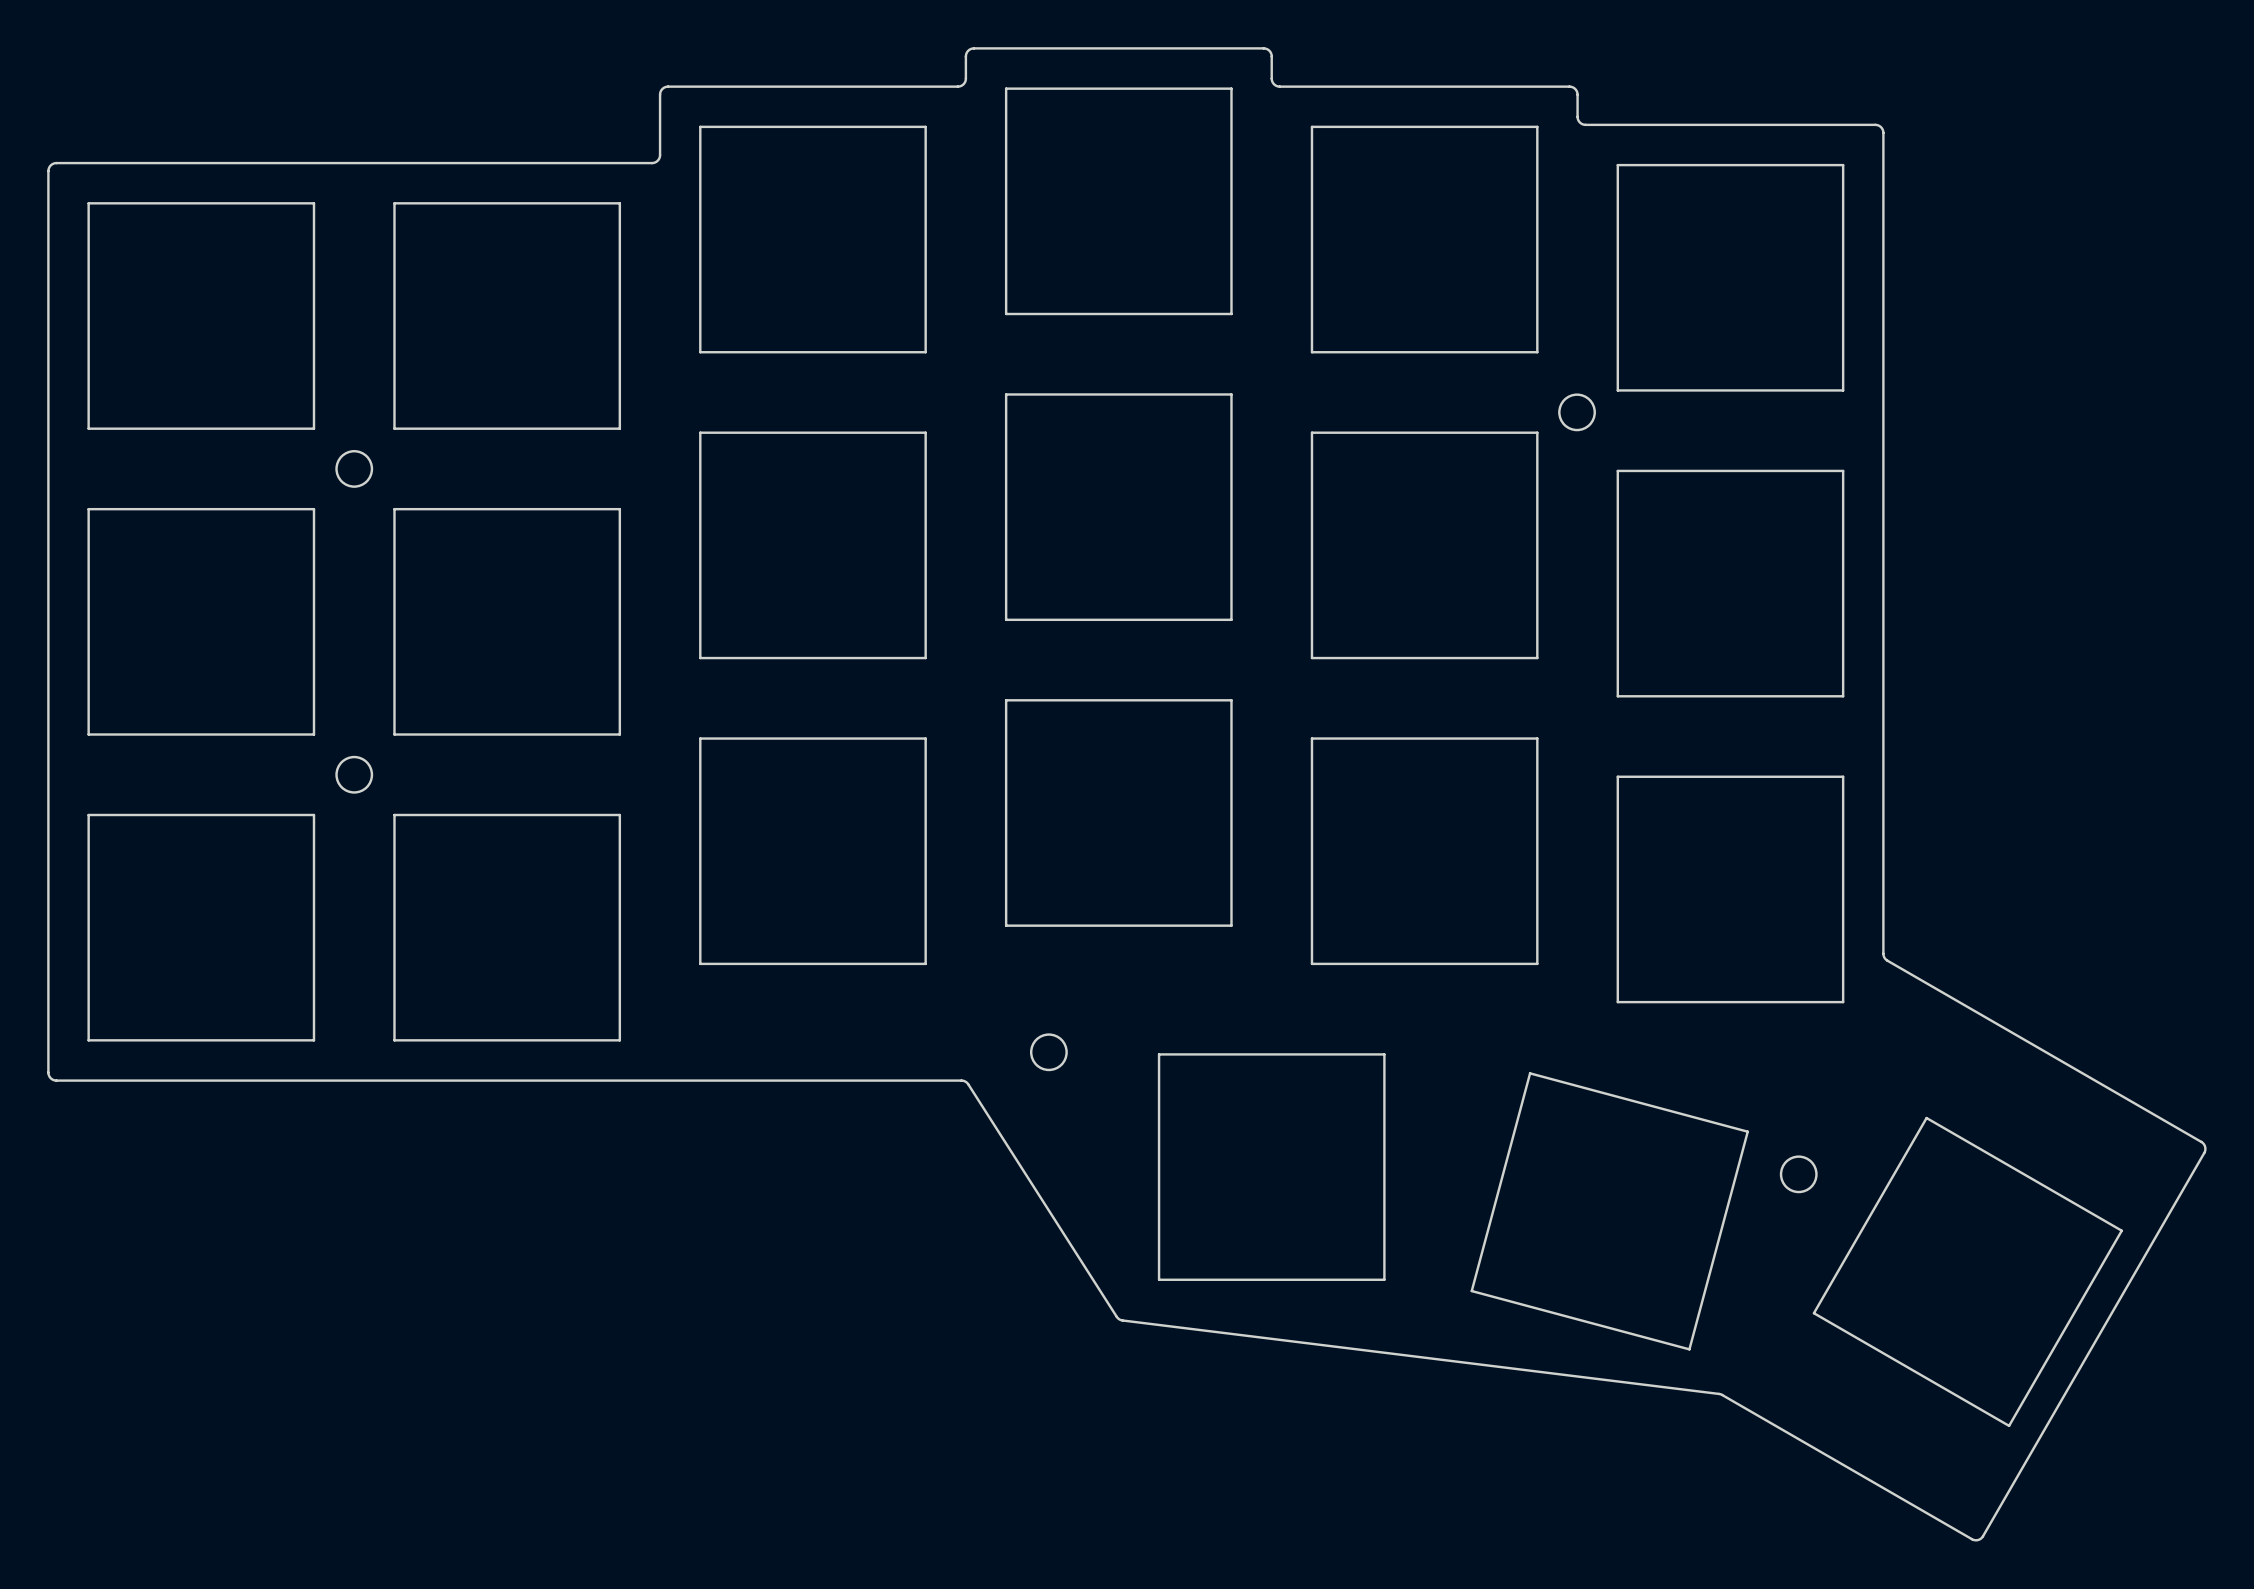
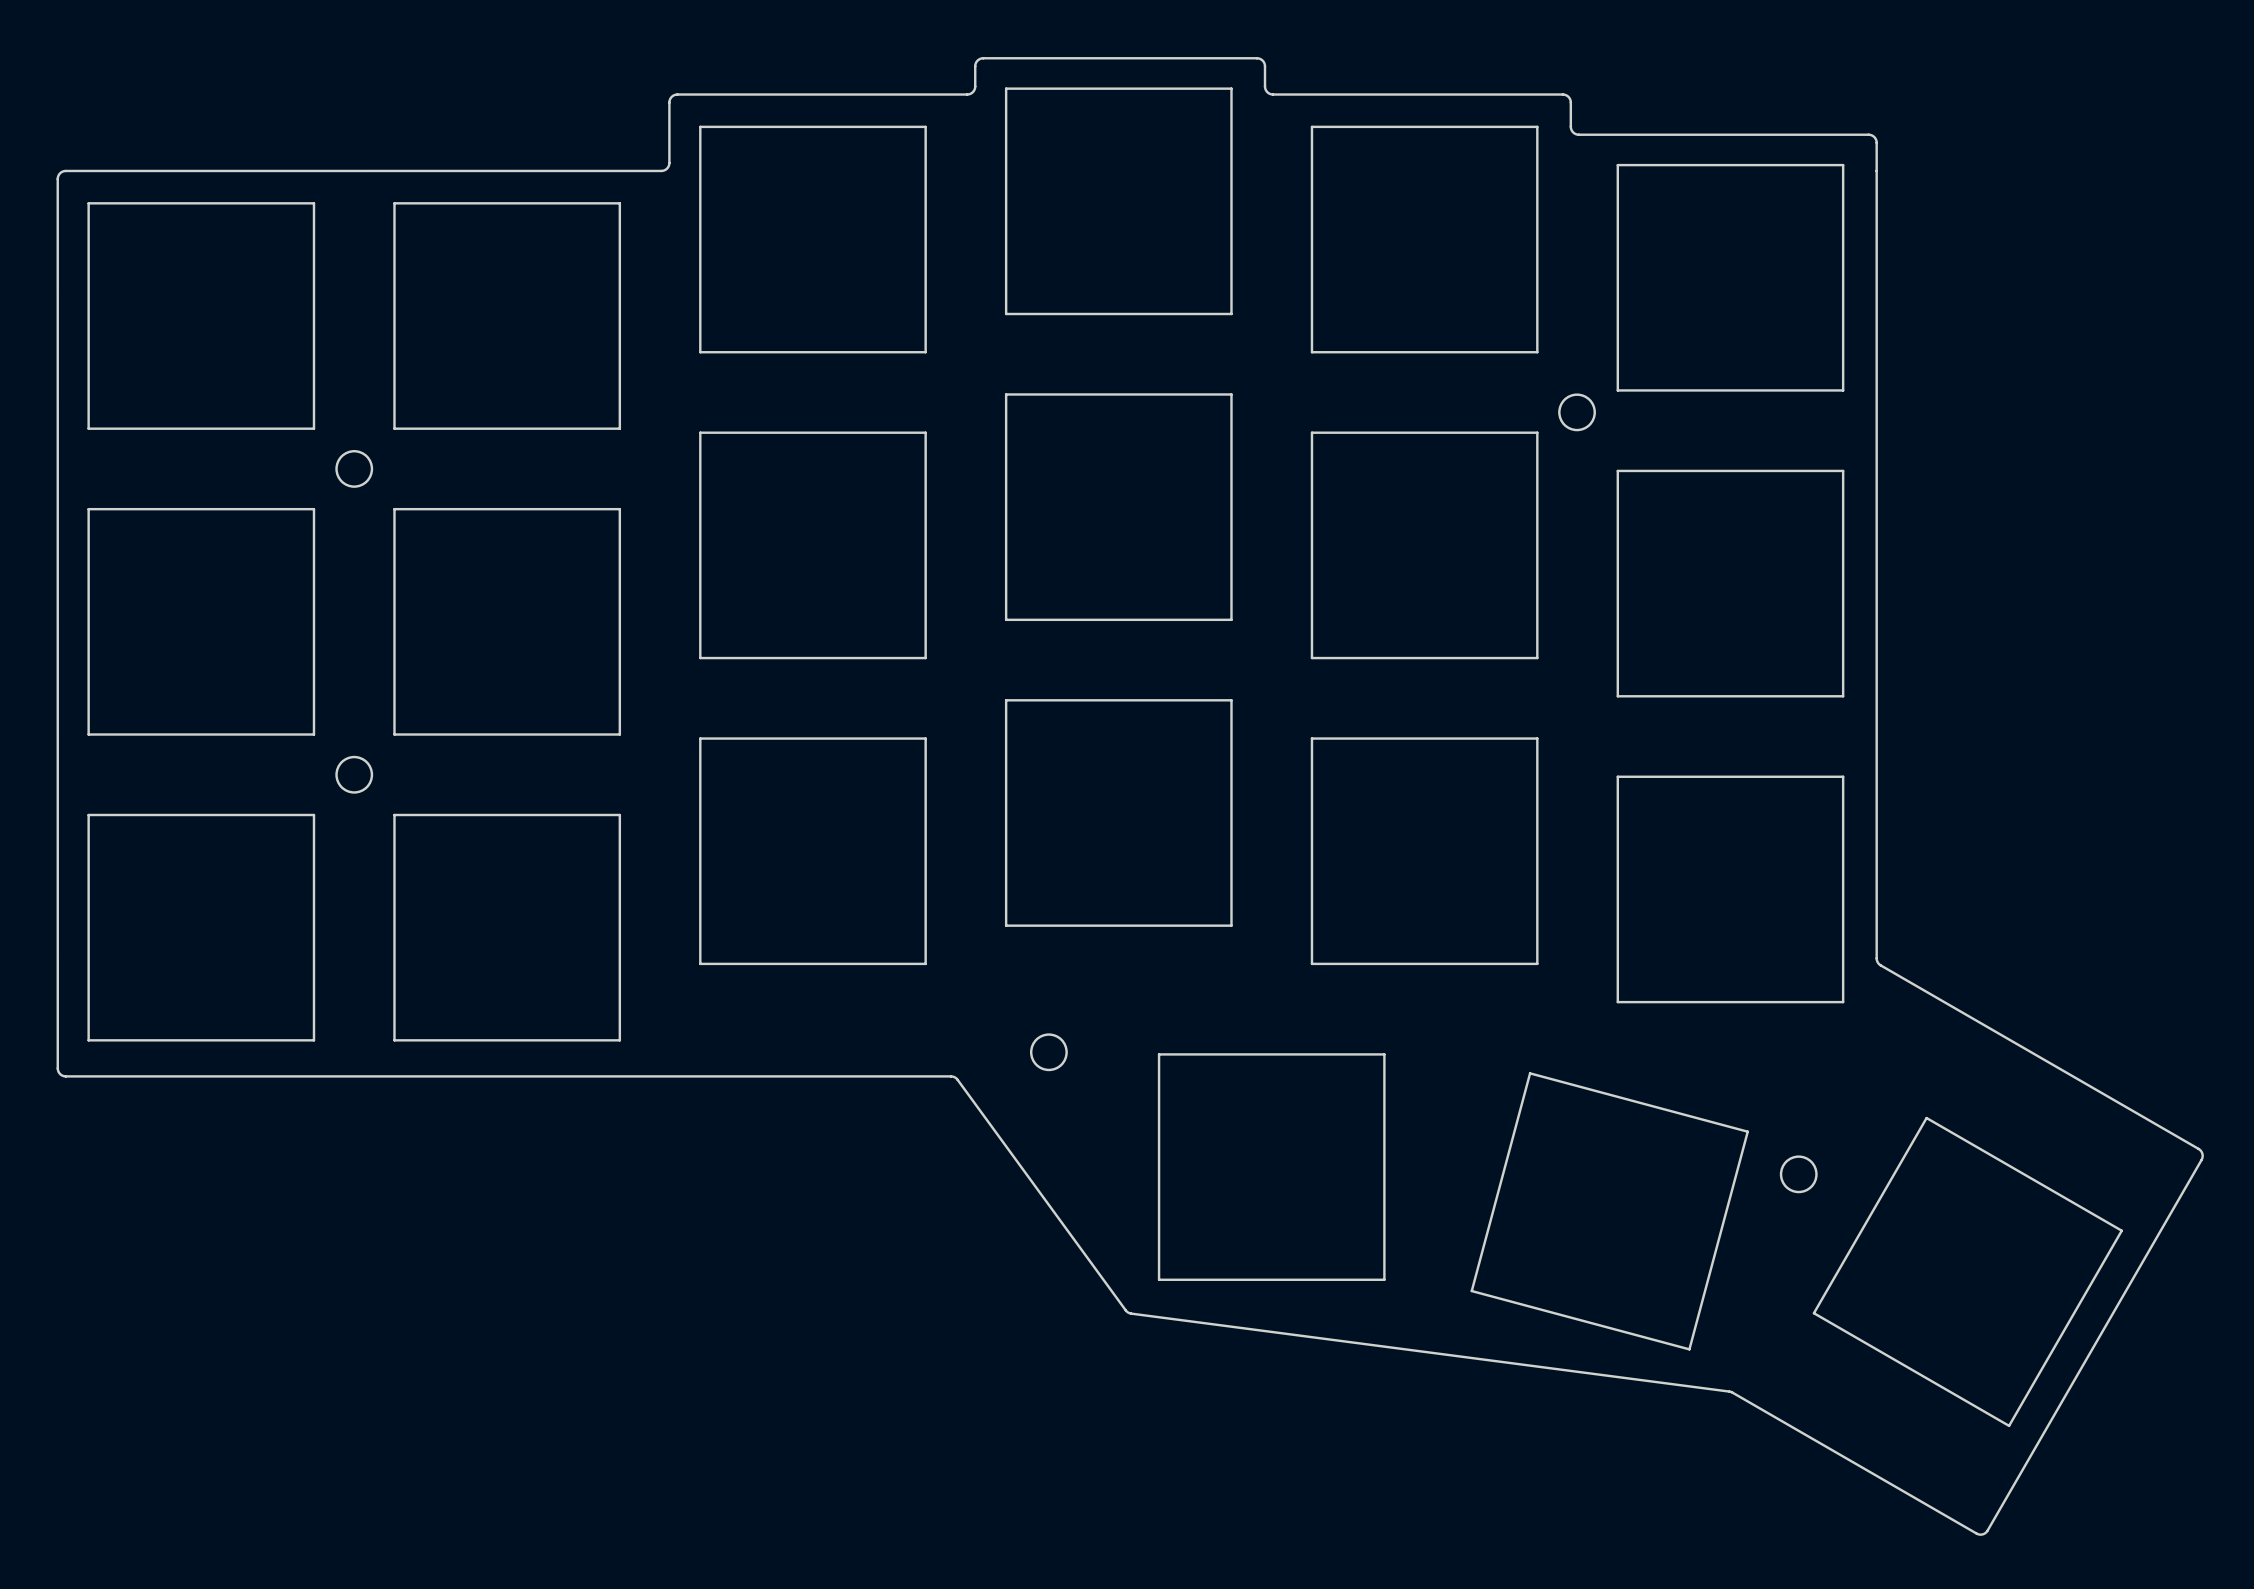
board edge: (973, 48) (1264, 48) (1271, 53) (1272, 80) (1278, 86) (1570, 86) (1576, 91) (1577, 118) (1584, 124) (1875, 124) (1881, 128) (1883, 132) (1883, 955) (1887, 960) (2201, 1141) (2205, 1147) (2204, 1152) (1980, 1538) (1972, 1539) (1719, 1394) (1120, 1319) (968, 1084) (963, 1080) (56, 1080) (50, 1077) (48, 1072) (48, 171) (50, 165) (56, 163) (653, 163) (657, 160) (660, 156) (660, 93) (665, 87) (958, 86) (965, 80) (966, 53) (973, 48) -> (1876, 170) (1876, 141) (1874, 137) (1869, 134) (1576, 134) (1570, 127) (1570, 100) (1563, 94) (1273, 94) (1265, 89) (1264, 64) (1258, 58) (983, 58) (975, 63) (974, 88) (968, 94) (674, 95) (669, 101) (669, 163) (667, 168) (662, 170) (62, 171) (57, 179) (58, 1072) (65, 1076) (952, 1076) (957, 1079) (1128, 1312) (1730, 1391) (1976, 1533) (1984, 1533) (2201, 1159) (2202, 1154) (2198, 1148) (1880, 965) (1876, 960) (1876, 170)

